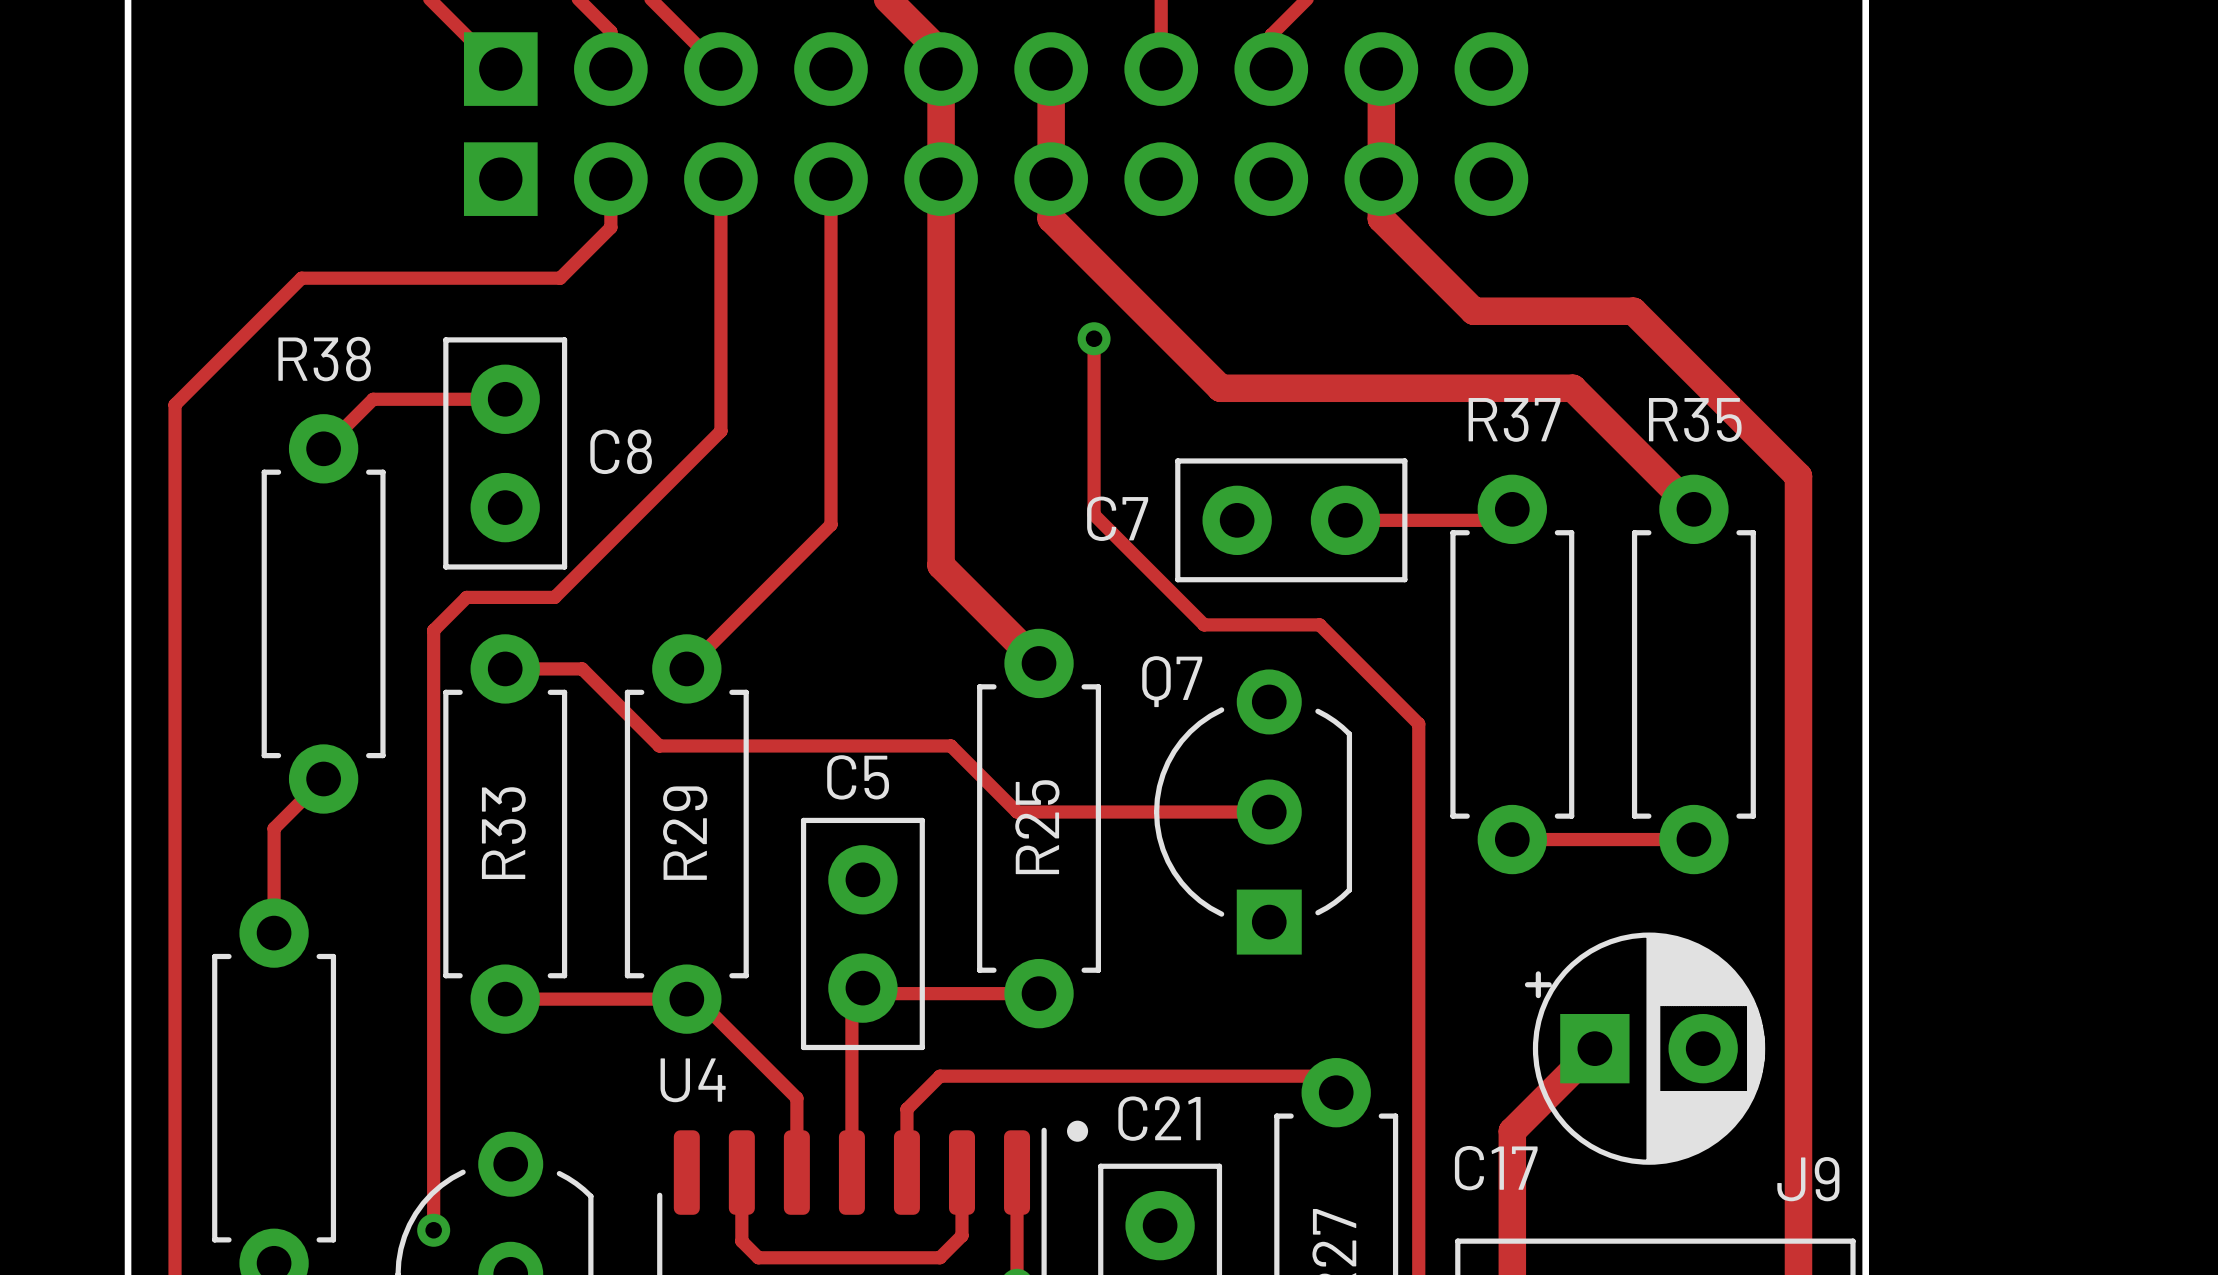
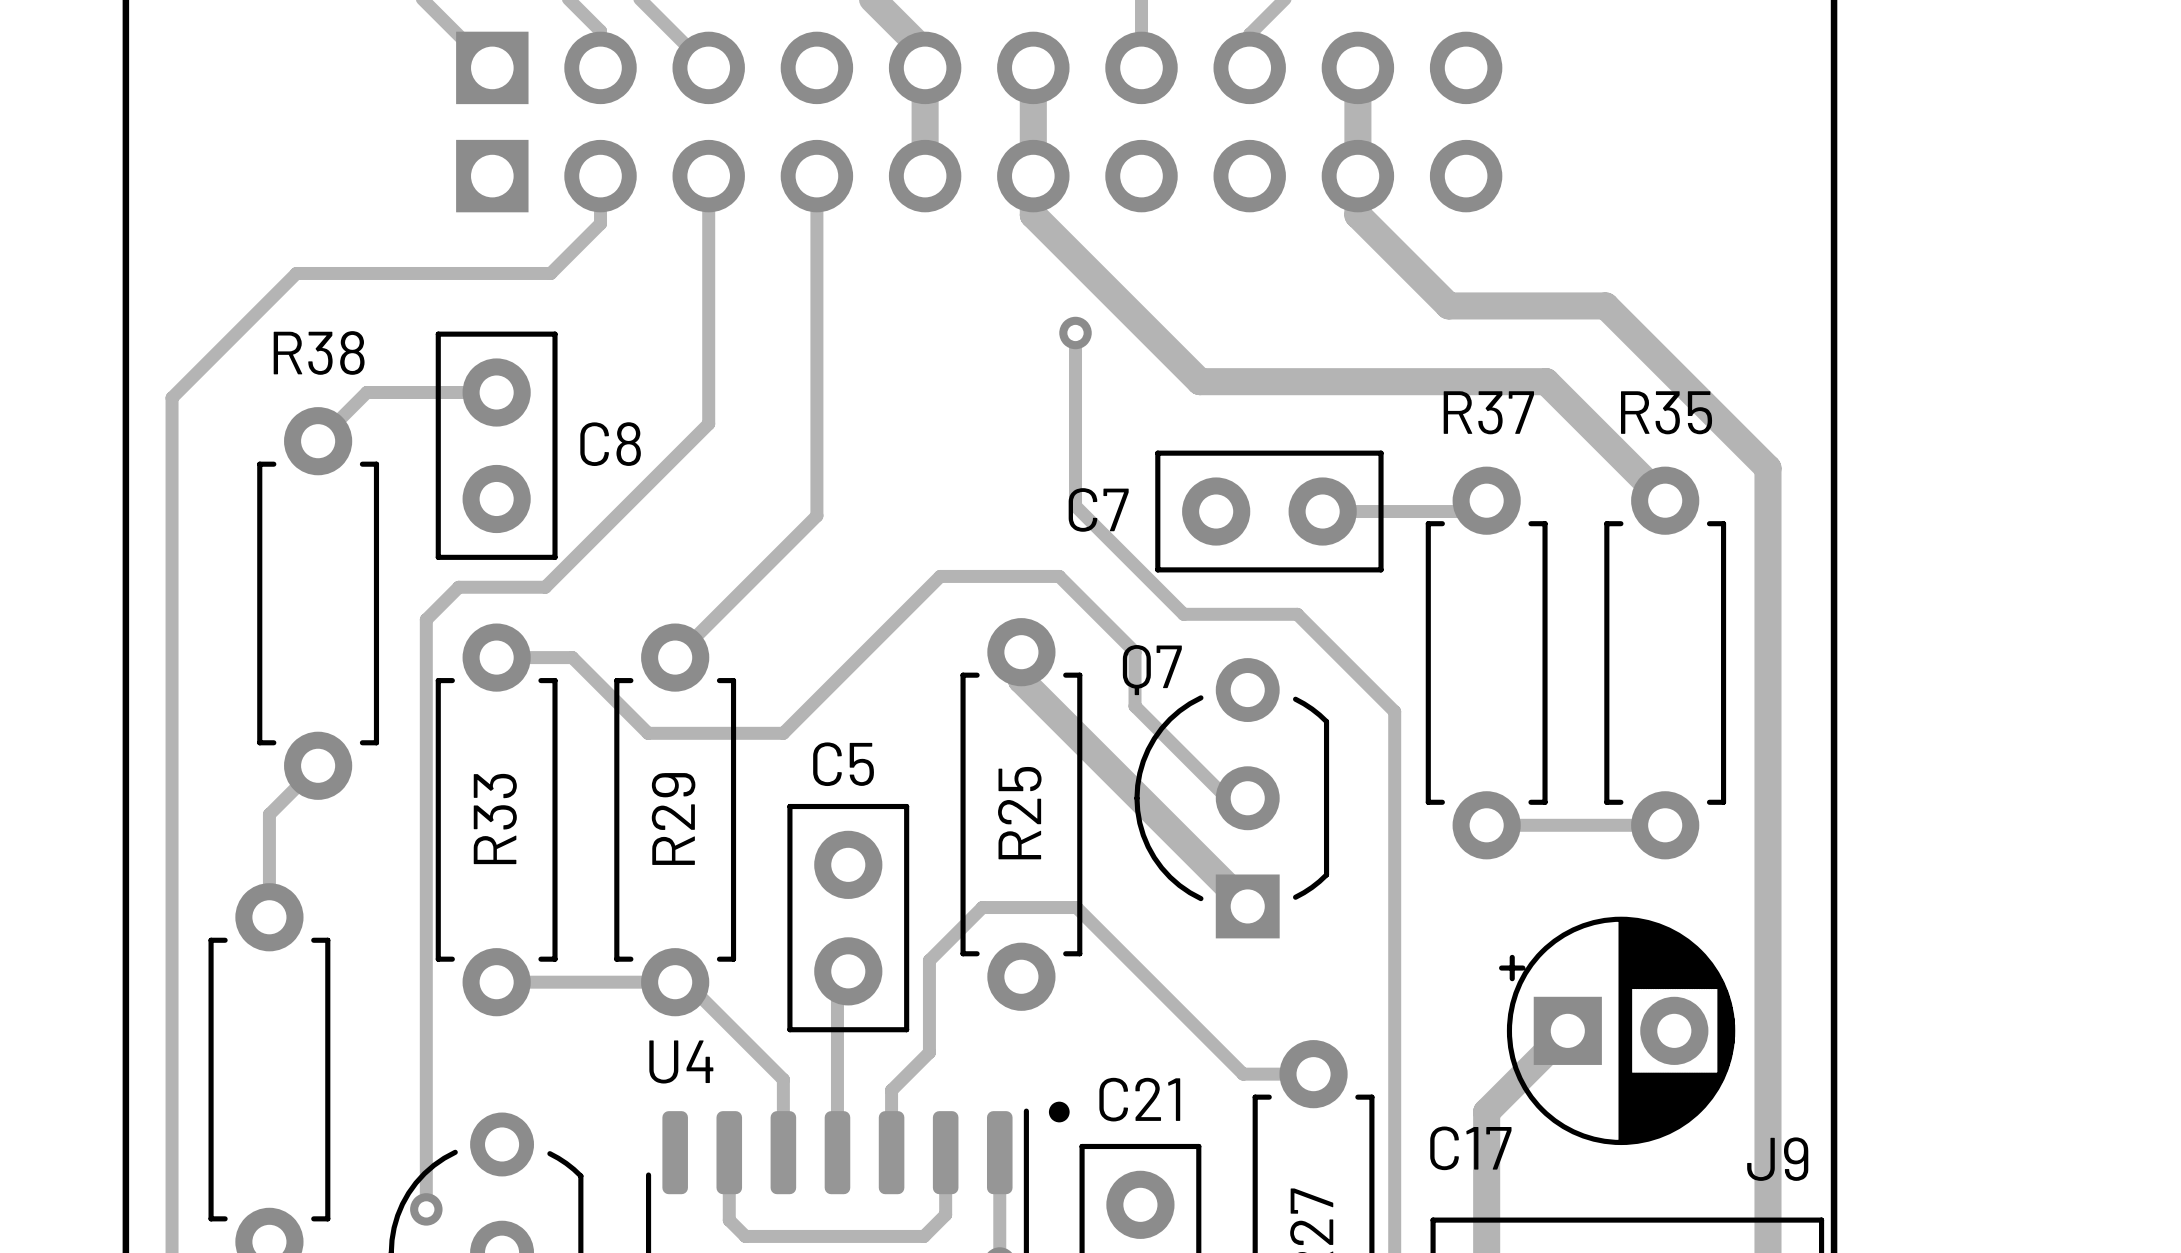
track: (941, 201) (941, 565) (1039, 663) -> (1247, 906) (1021, 680) (1021, 652)
track: (796, 745) (950, 745) (1017, 812) (1248, 812) -> (783, 733) (940, 576) (1059, 576) (1135, 652) (1135, 706) (1226, 798)
track: (862, 988) (868, 993) (1039, 993) -> none
track: (939, 1076) (1319, 1076) (1336, 1092) -> (924, 1057) (929, 1052) (929, 960) (982, 907) (1076, 907) (1243, 1074) (1313, 1074)

